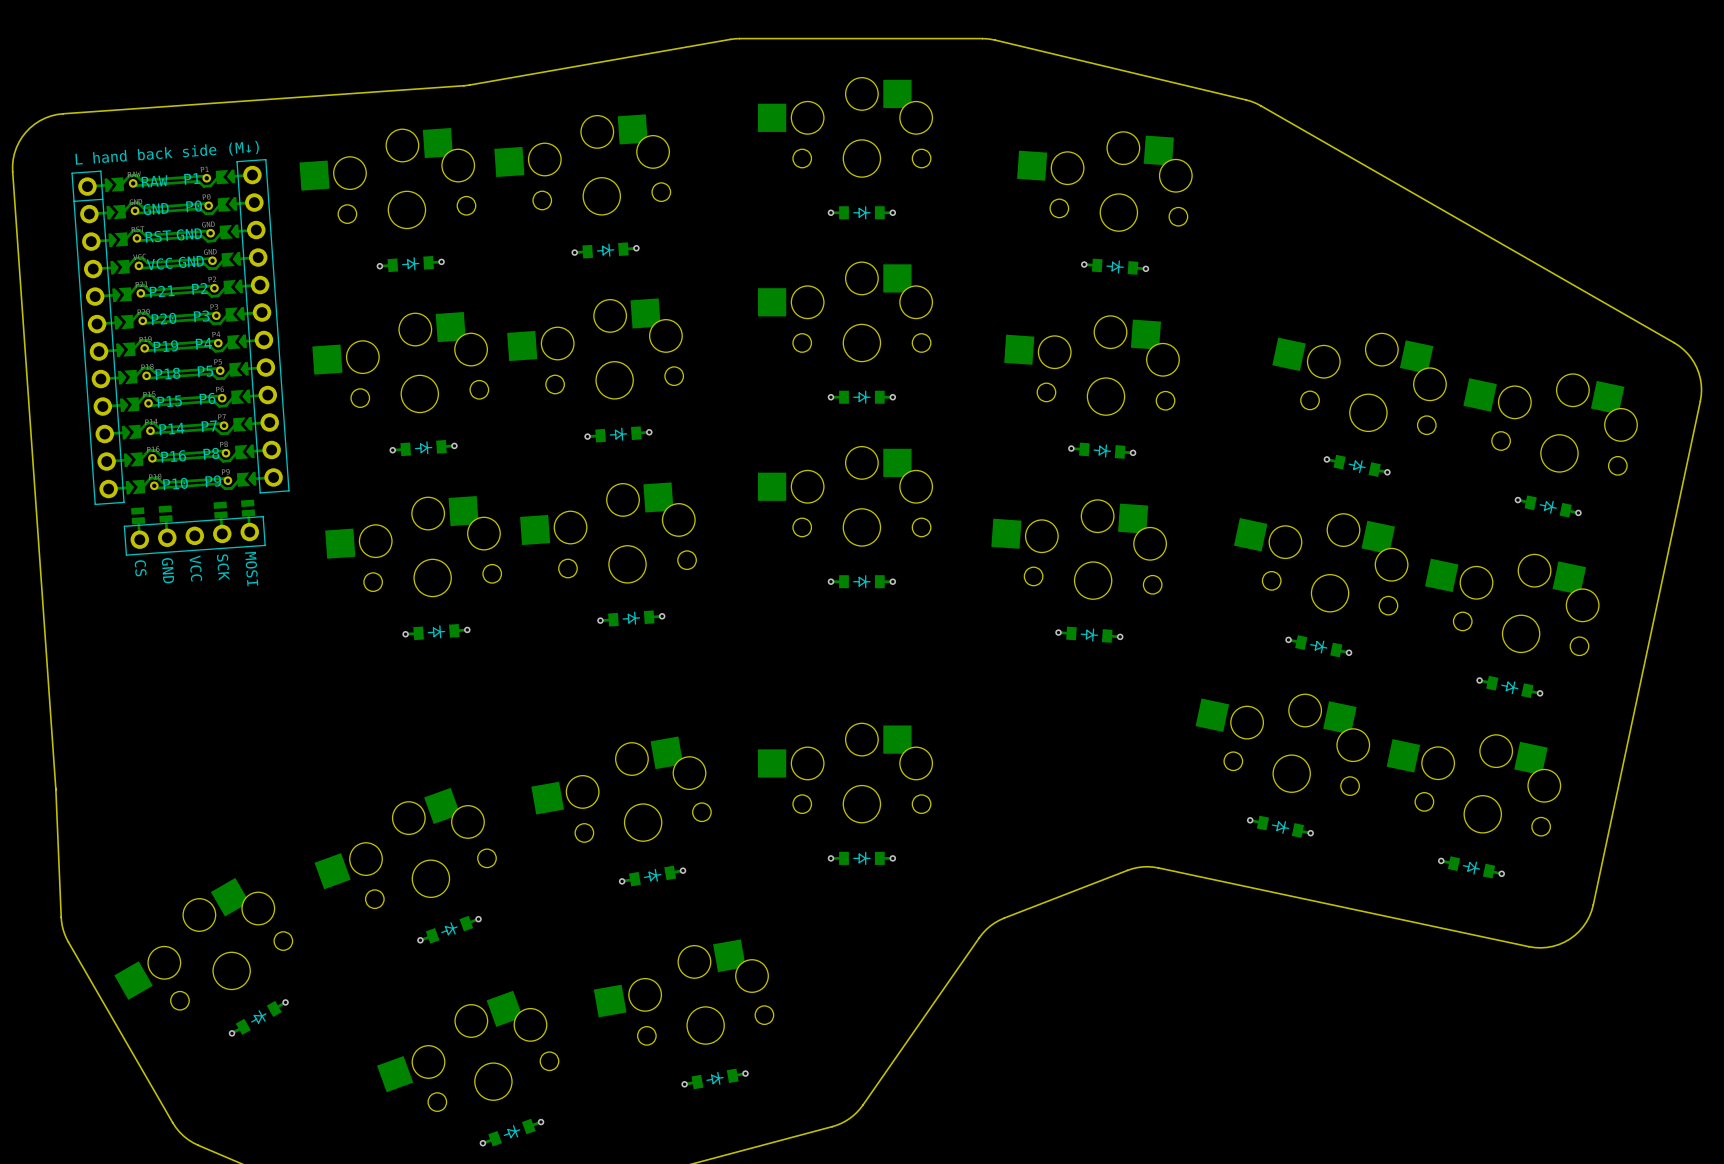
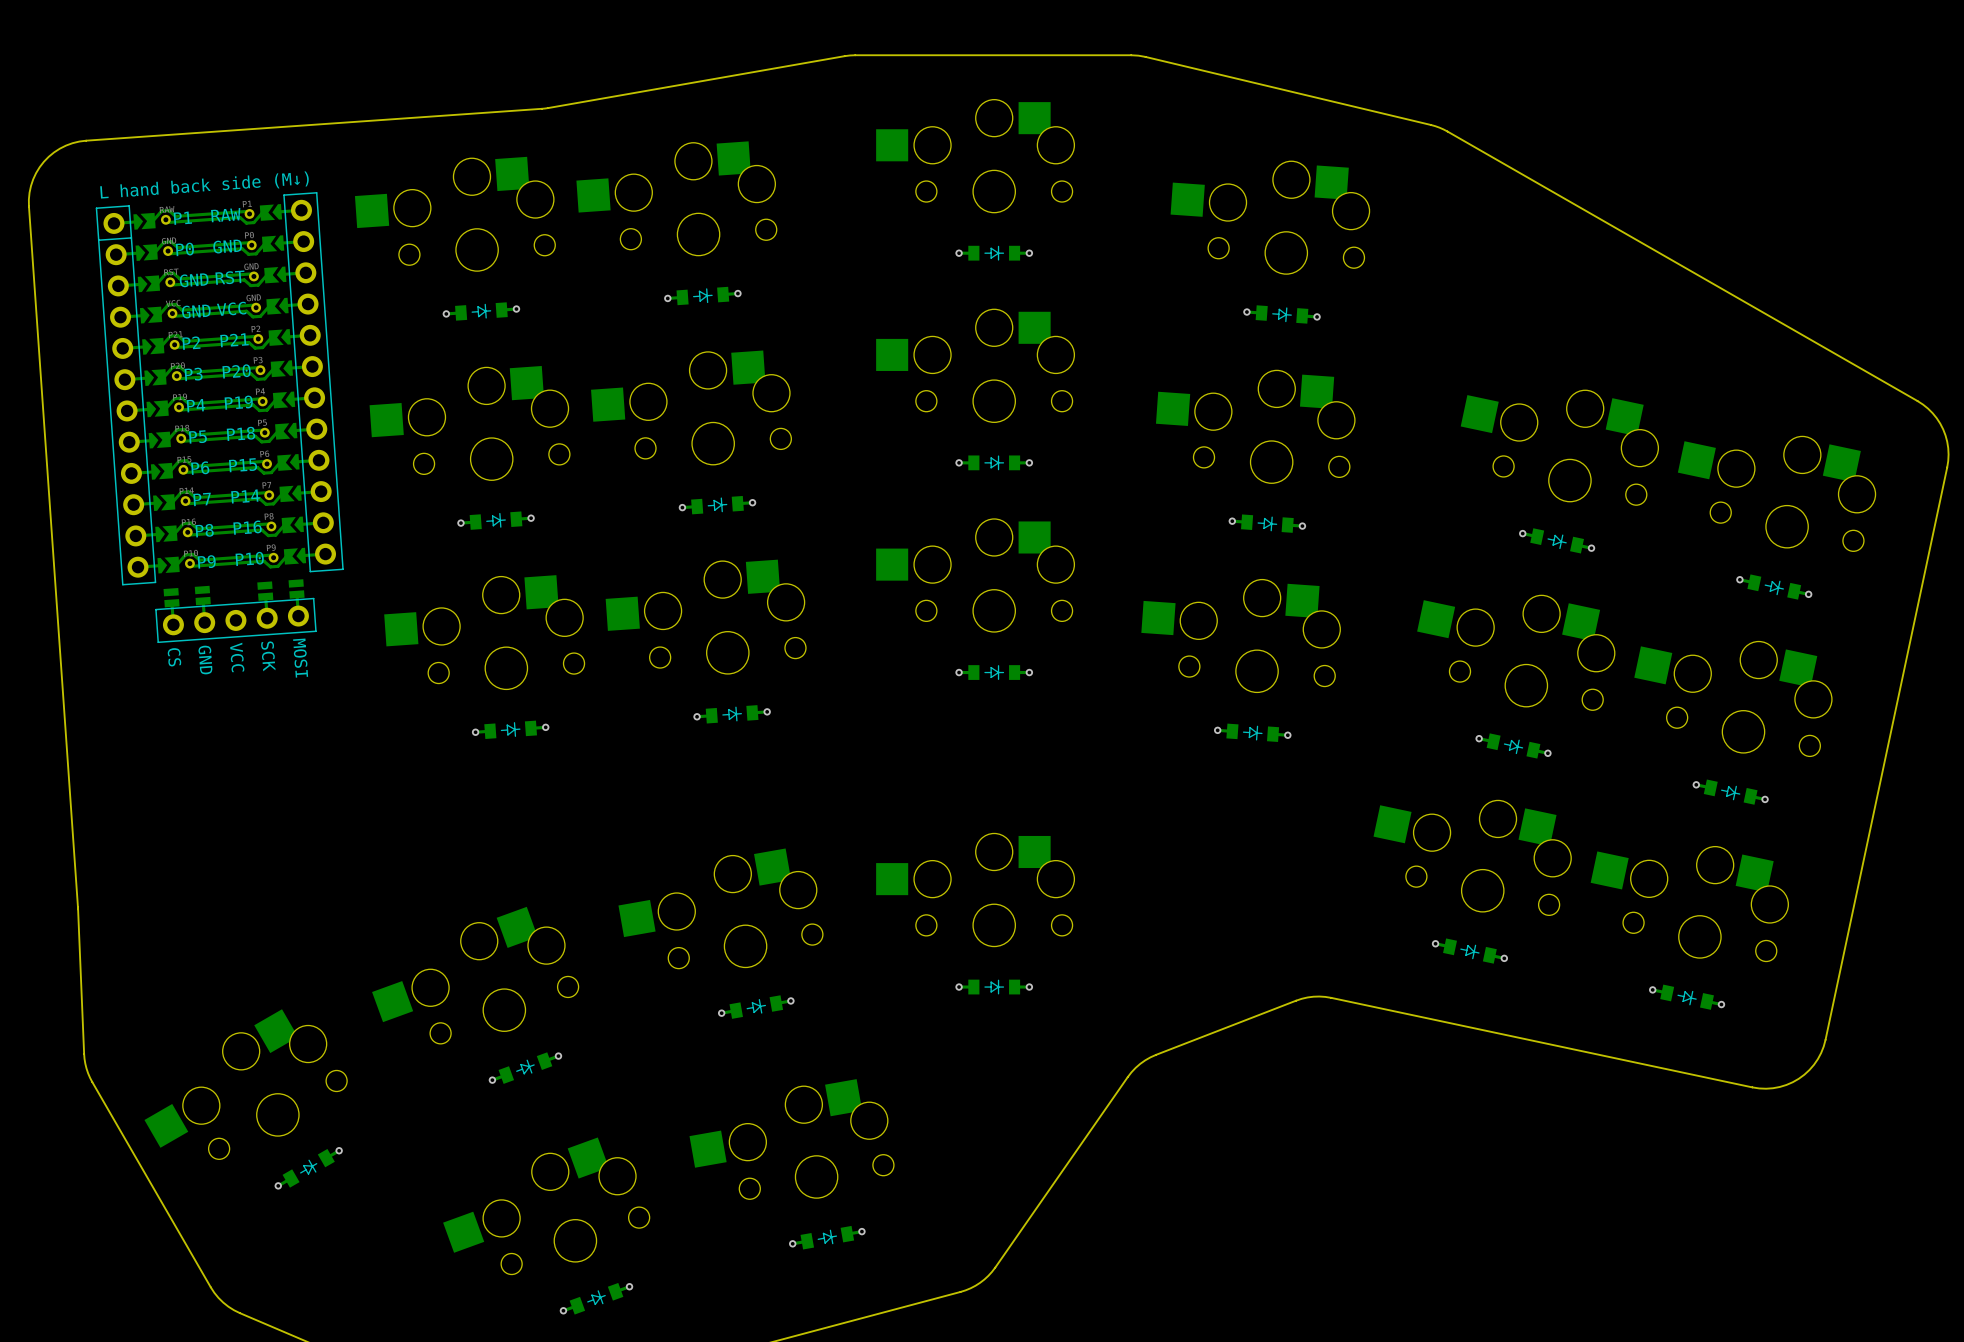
part footprint: [71, 158, 290, 506] -> [95, 192, 344, 586]

